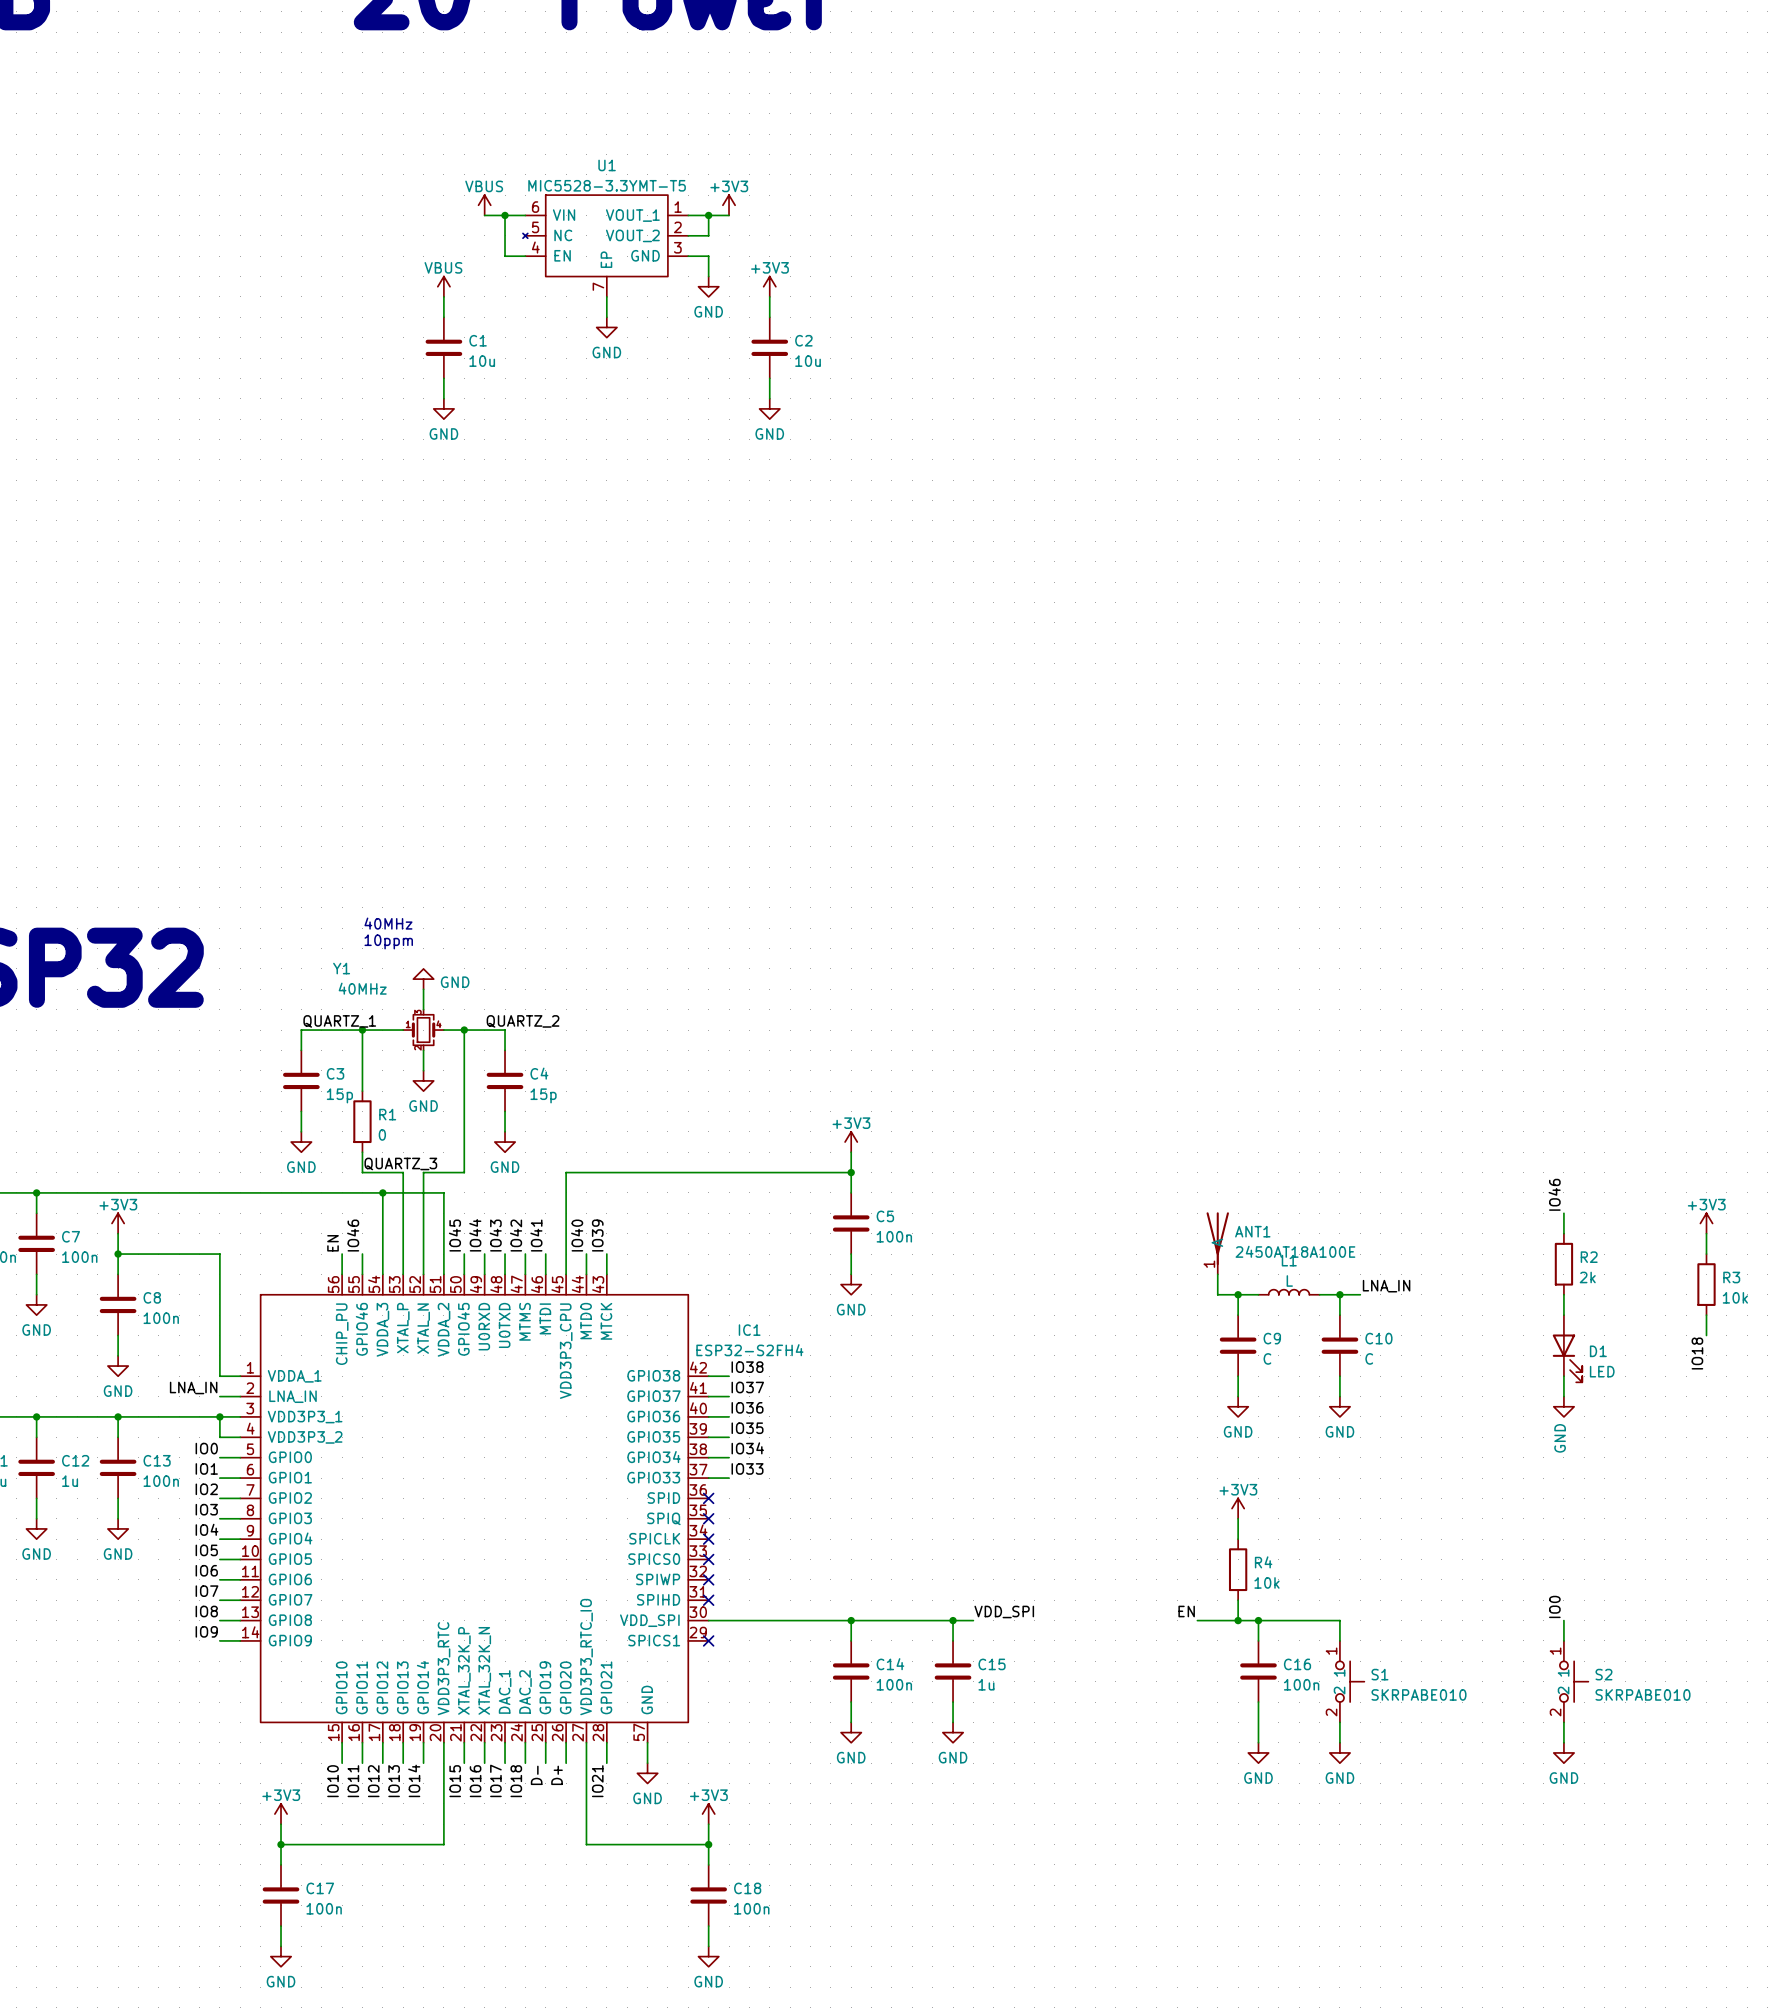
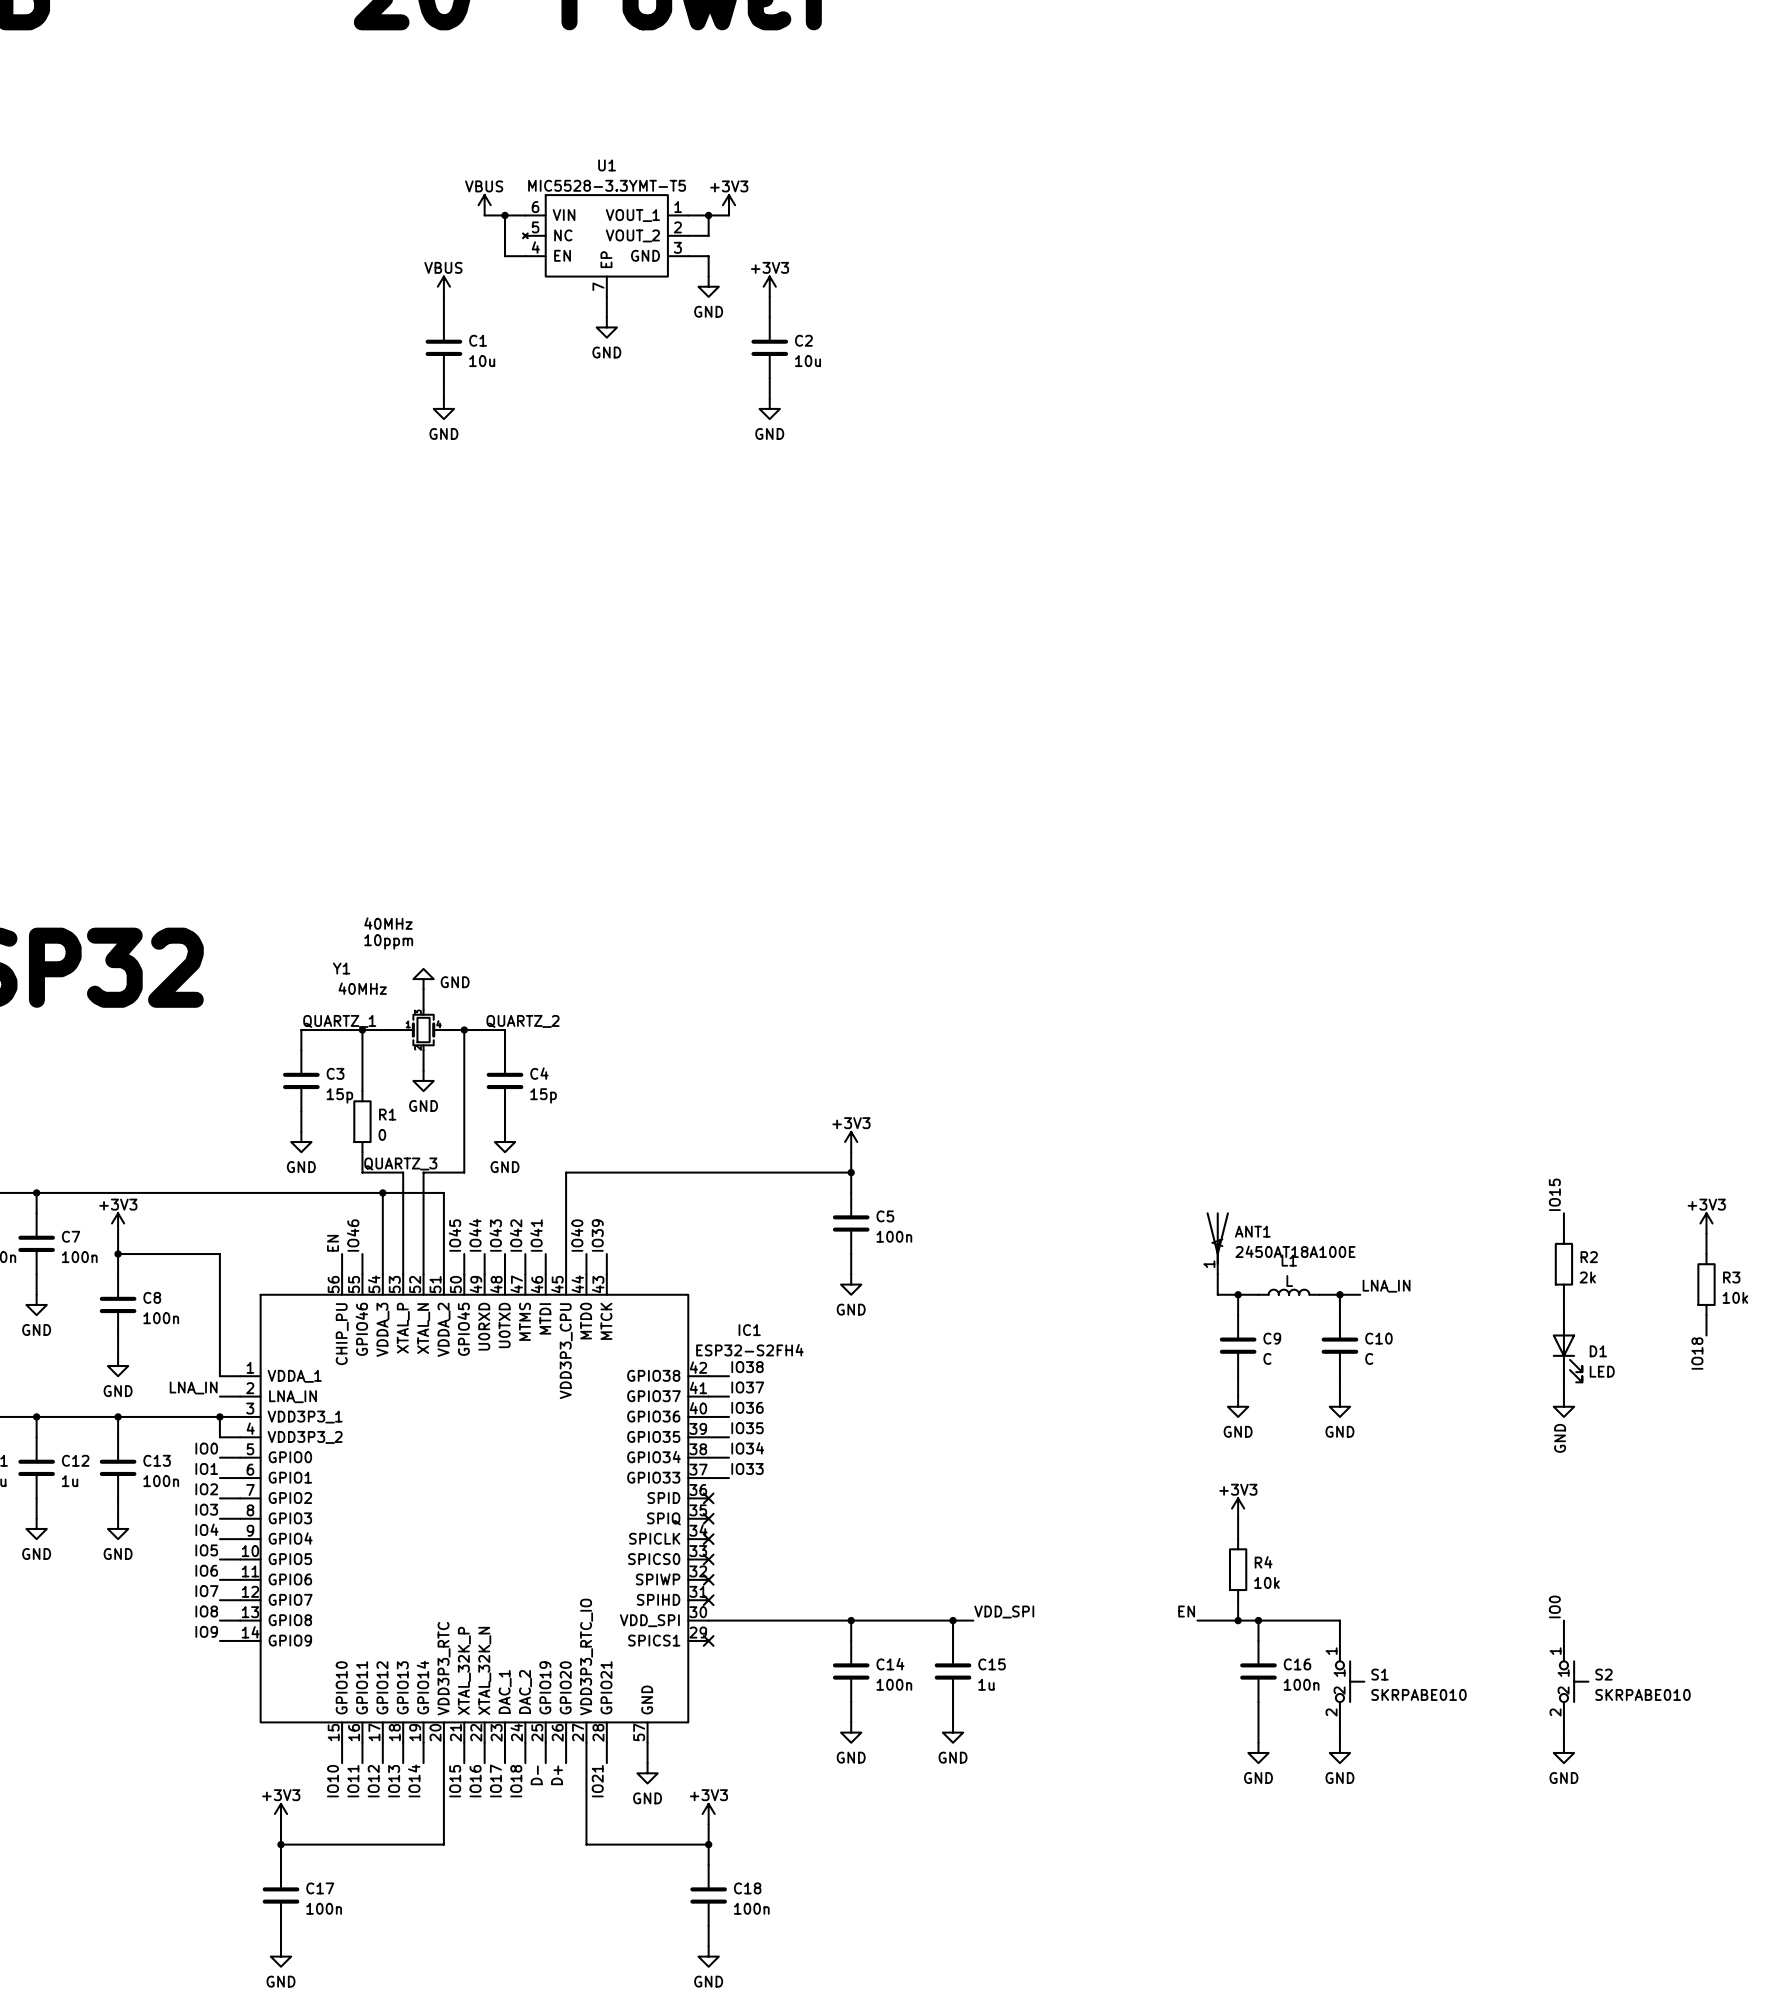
label: IO46 (1554, 1194) -> IO15 (1554, 1194)

